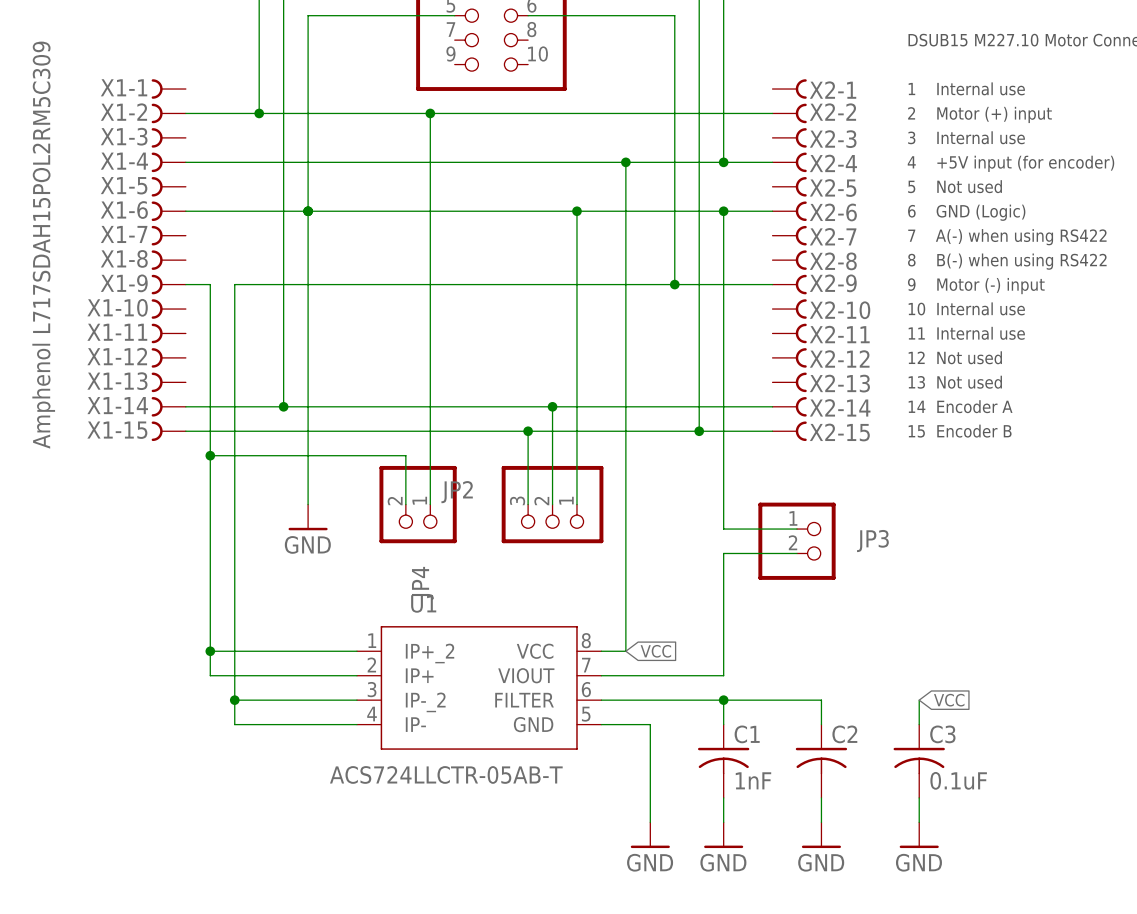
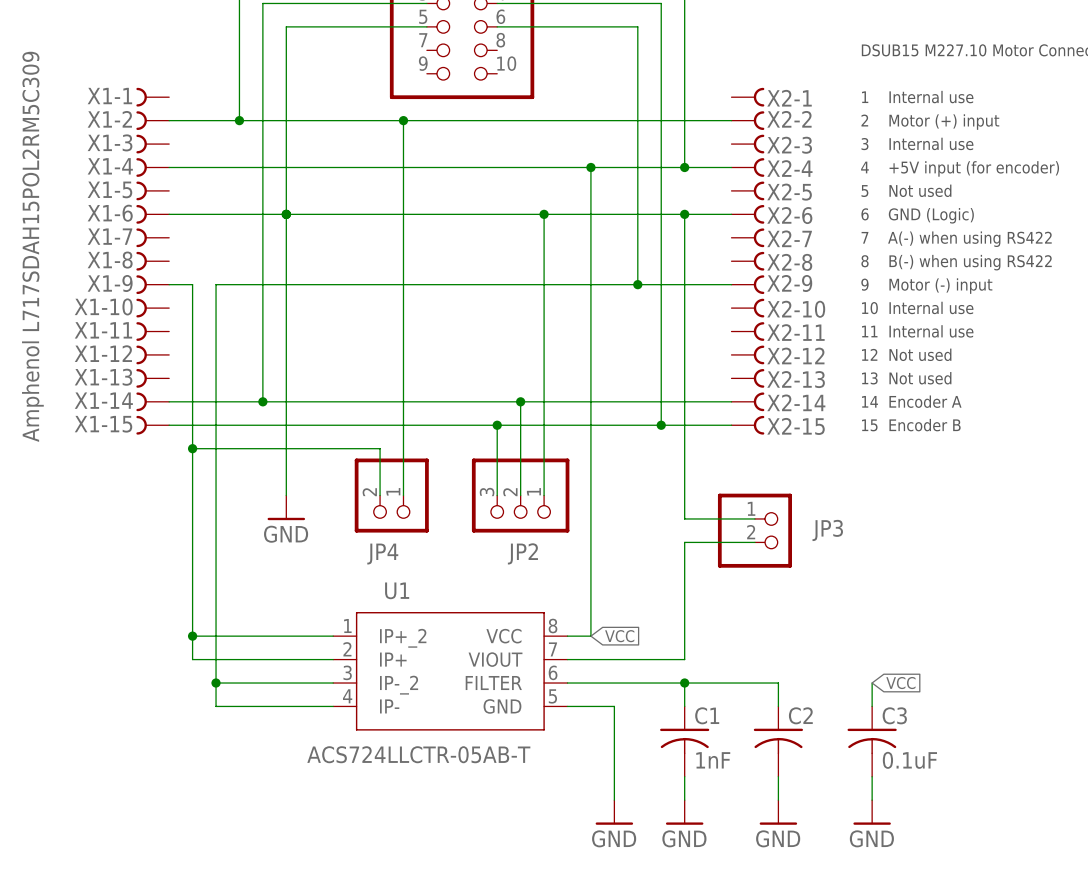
JP2 name position: JP2 (457, 492) -> JP2 (522, 553)
JP4 name rotation: 0° (422, 583) -> 90° clockwise (382, 554)

